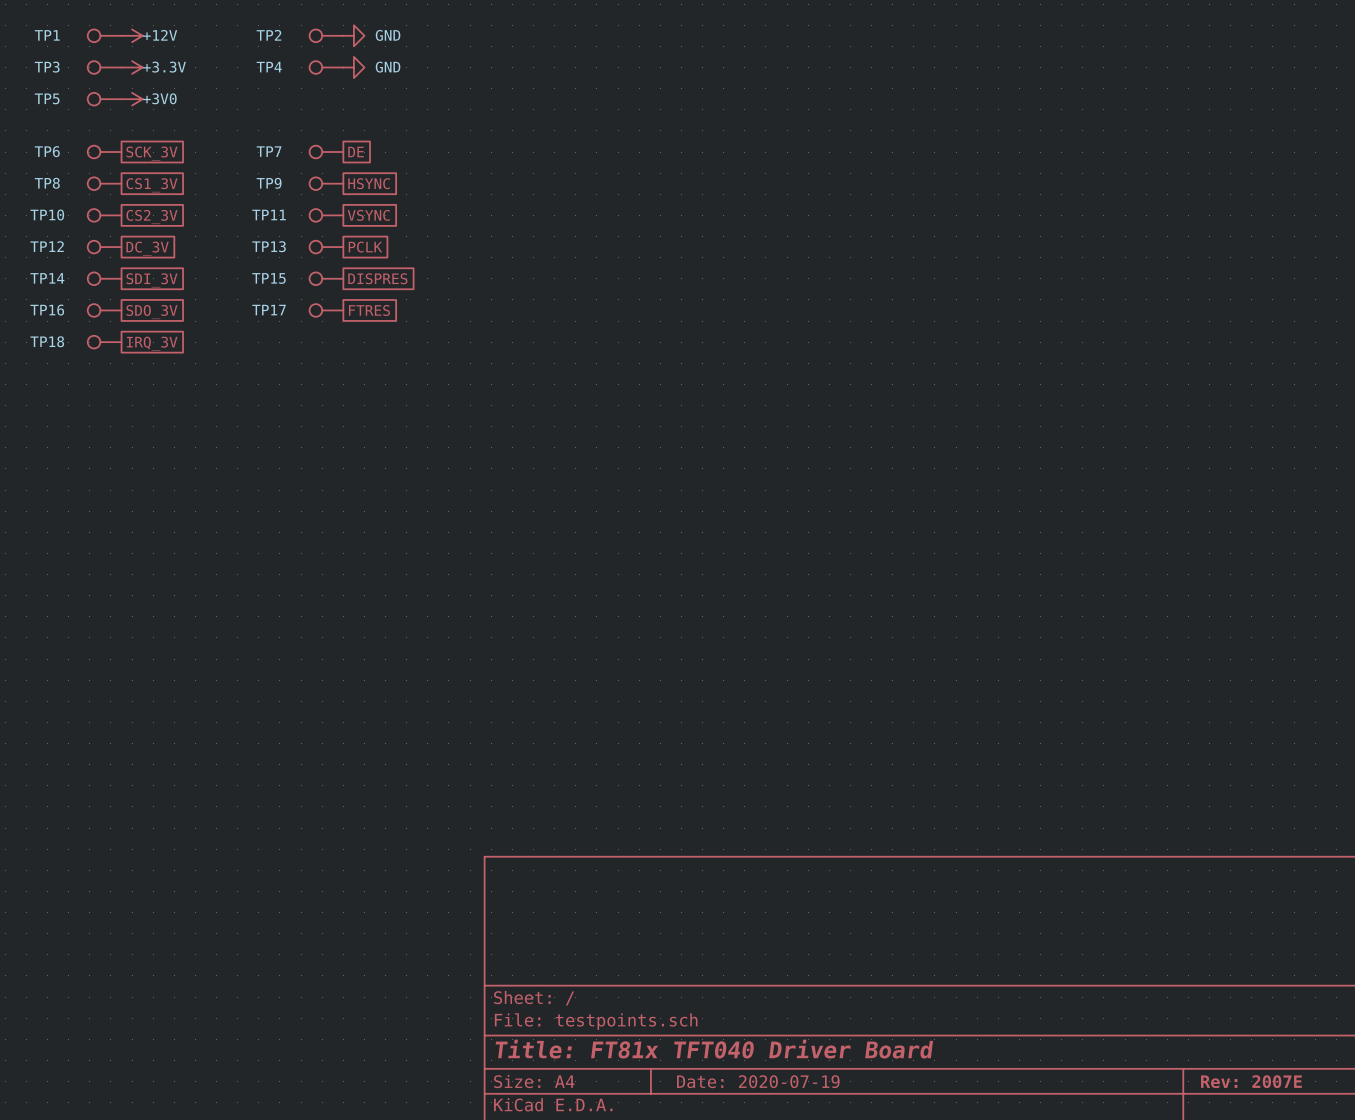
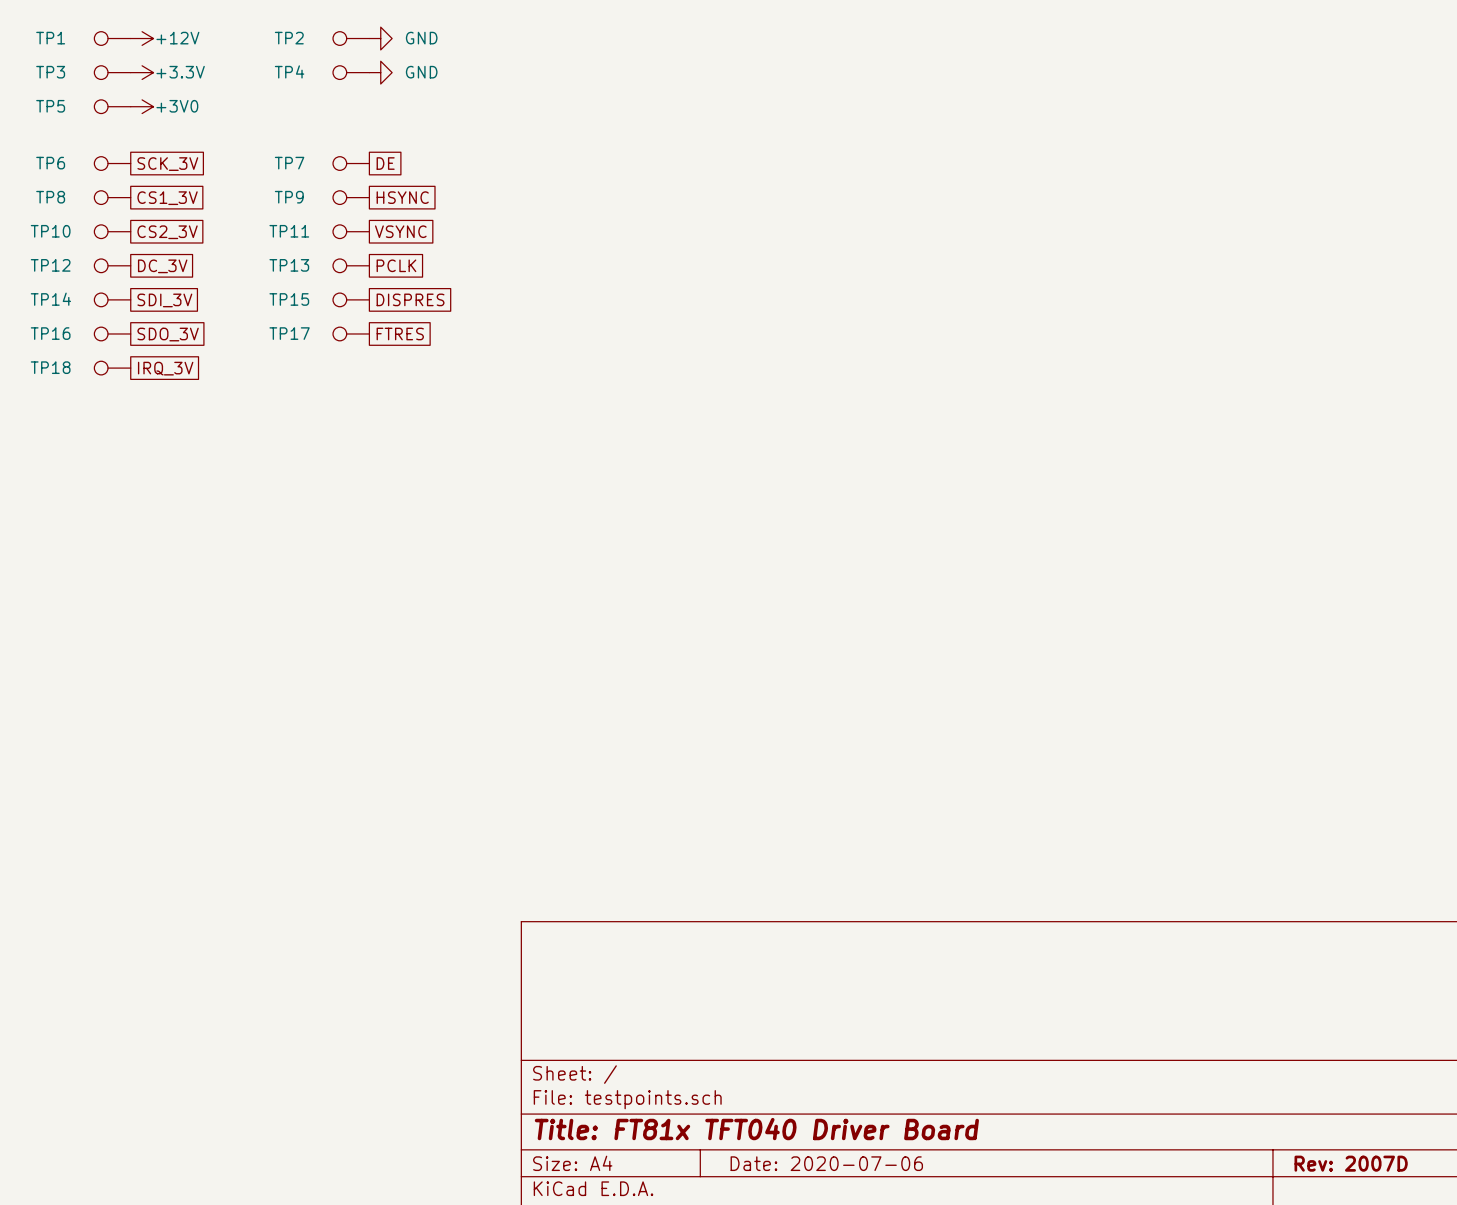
title block: Date: 2020-07-19 (758, 1081) -> Date: 2020-07-06 (826, 1163)
title block: Rev: 2007E (1251, 1081) -> Rev: 2007D (1351, 1163)

